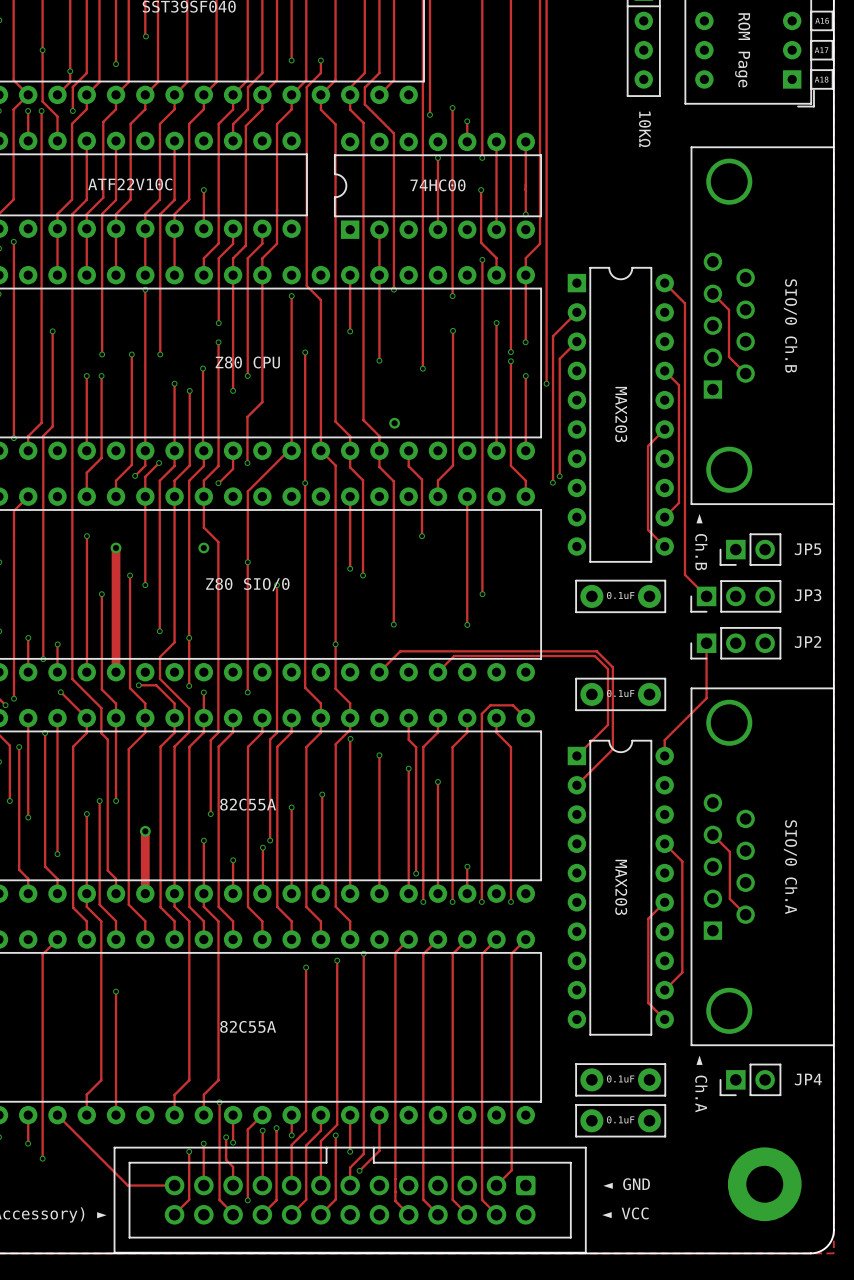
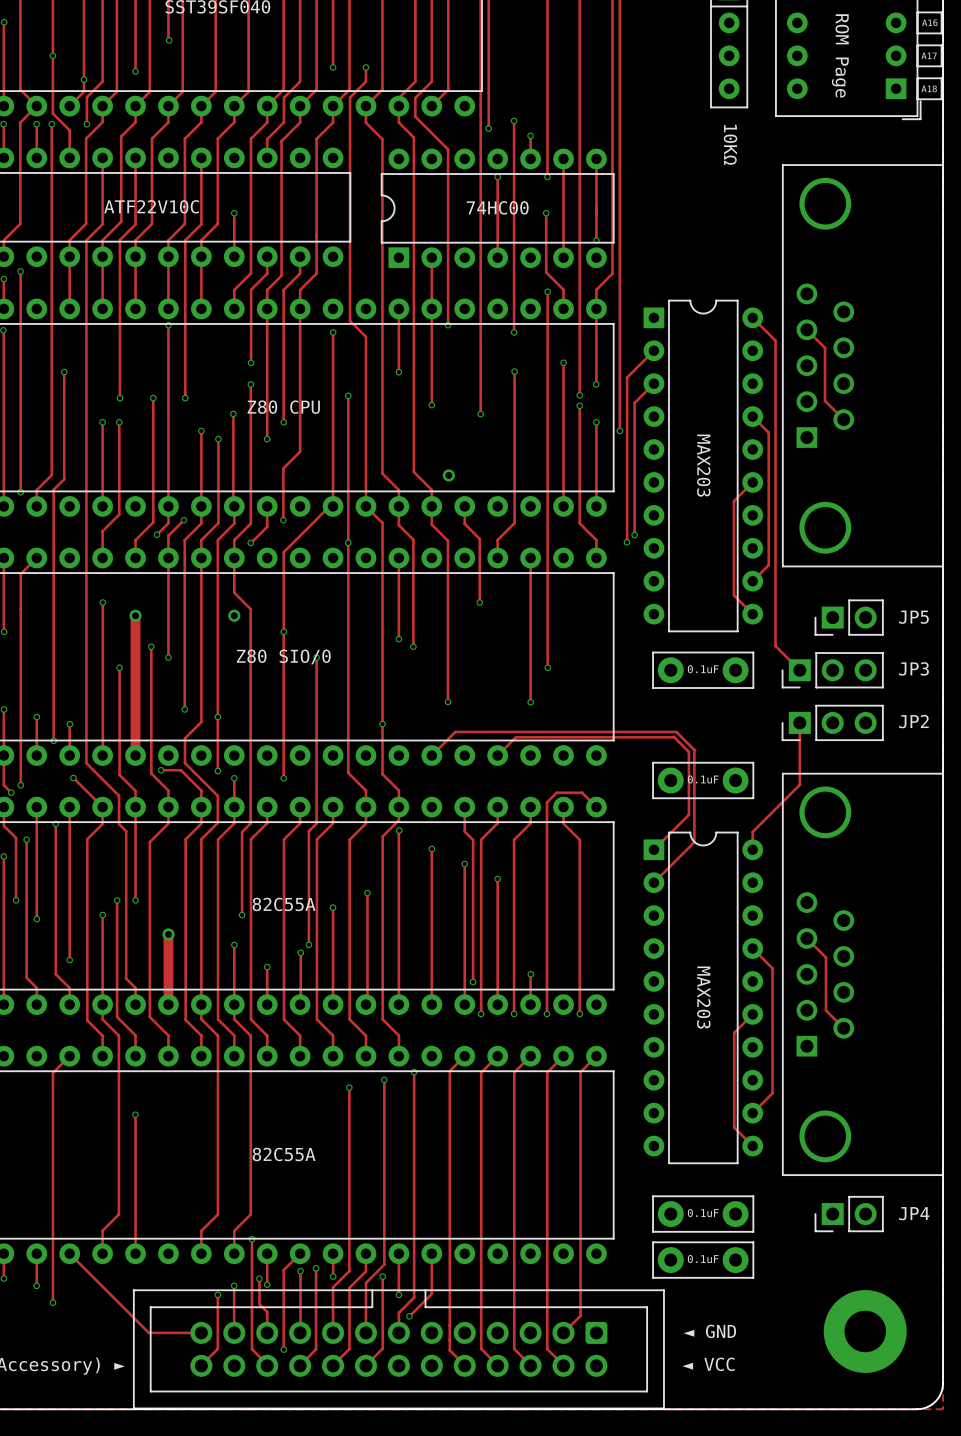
text: SIO/0 Ch.B (790, 325) -> none
text: ◄ Ch.B (701, 542) -> none
text: SIO/0 Ch.A (790, 867) -> none
text: ◄ Ch.A (701, 1083) -> none

